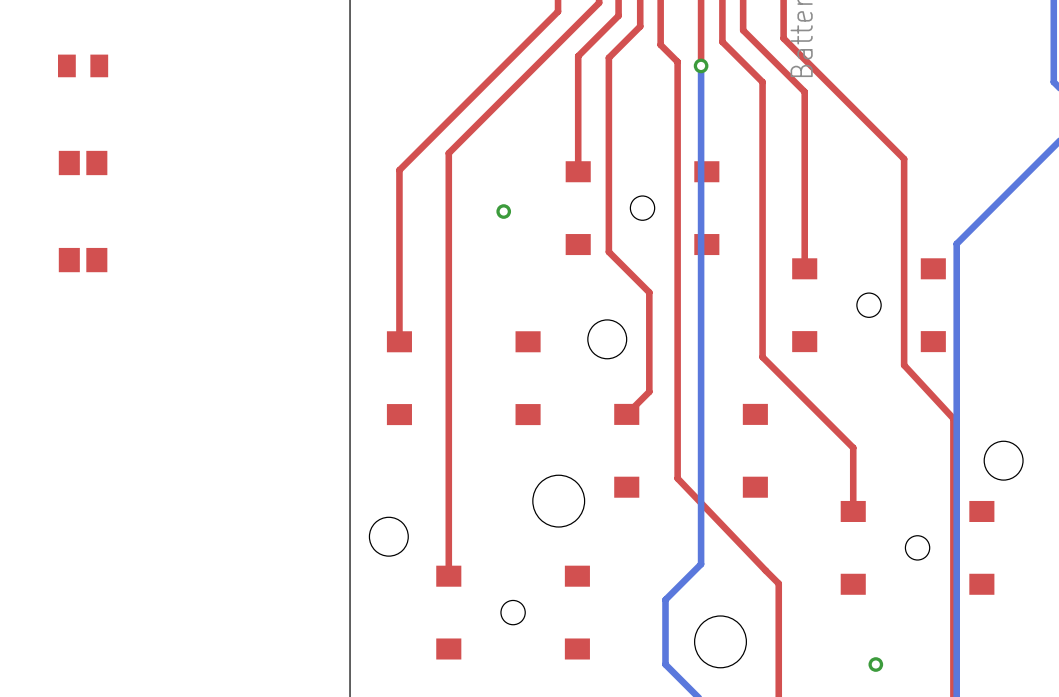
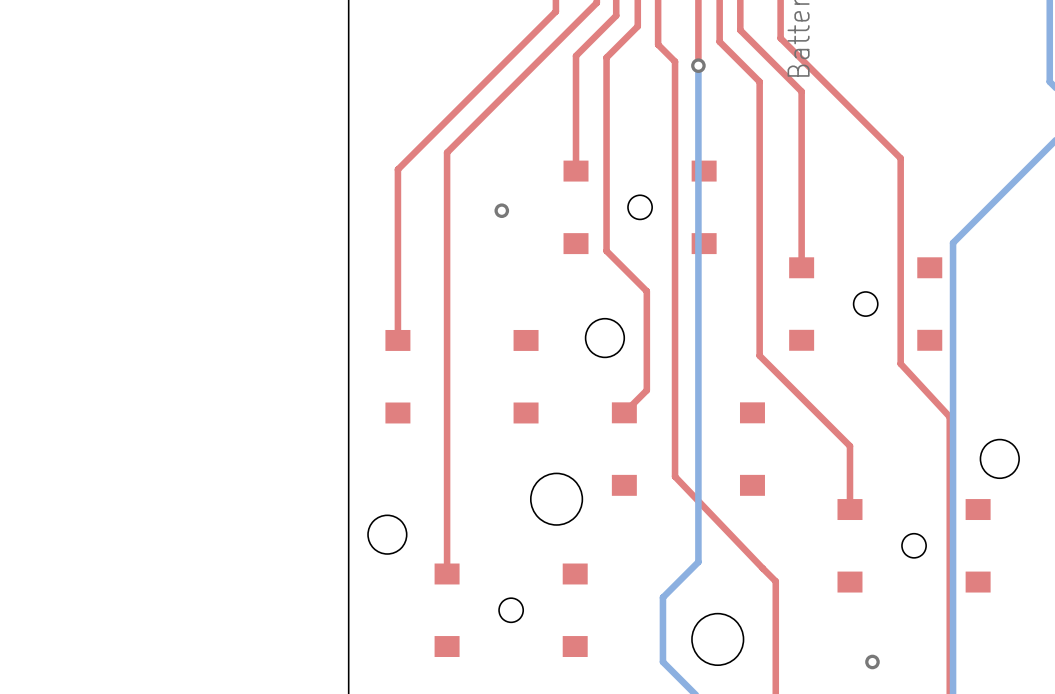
part: (83, 65) -> none
part: (83, 163) -> none
part: (83, 260) -> none

